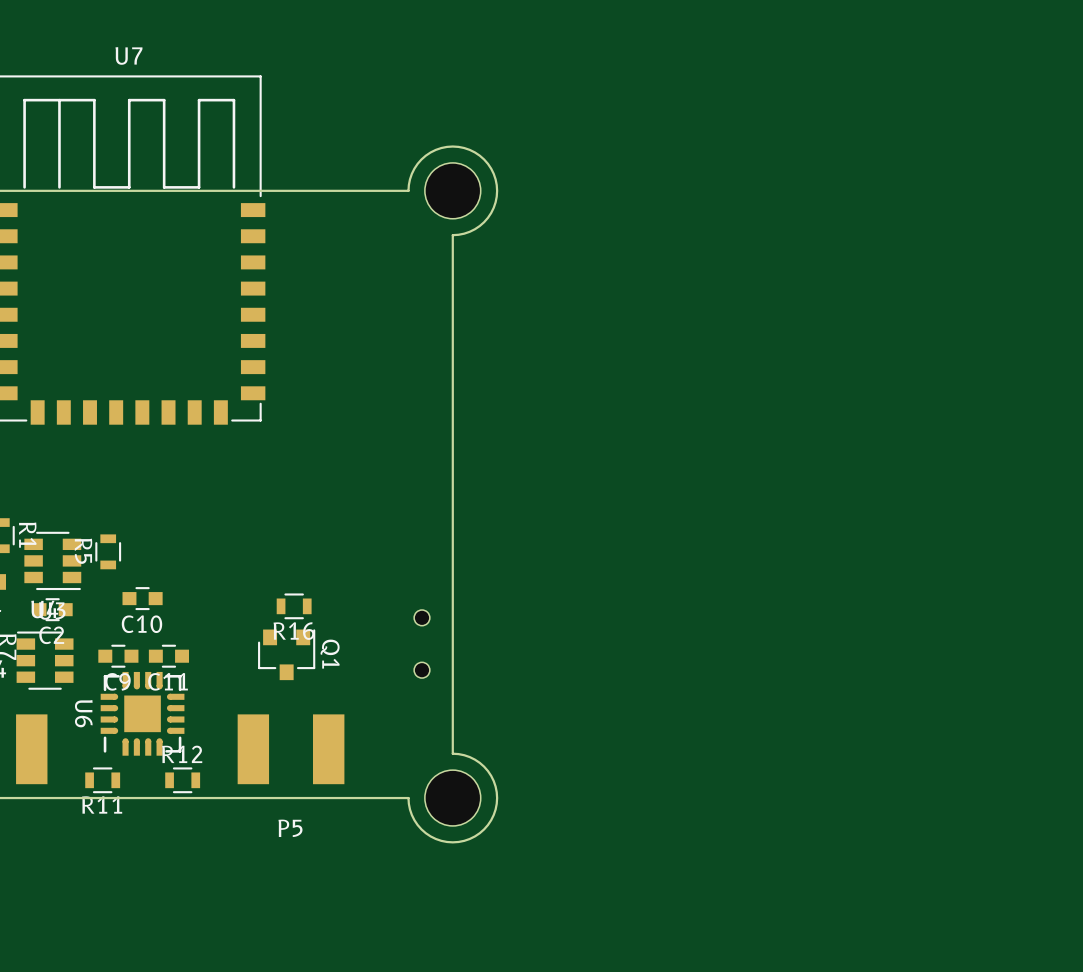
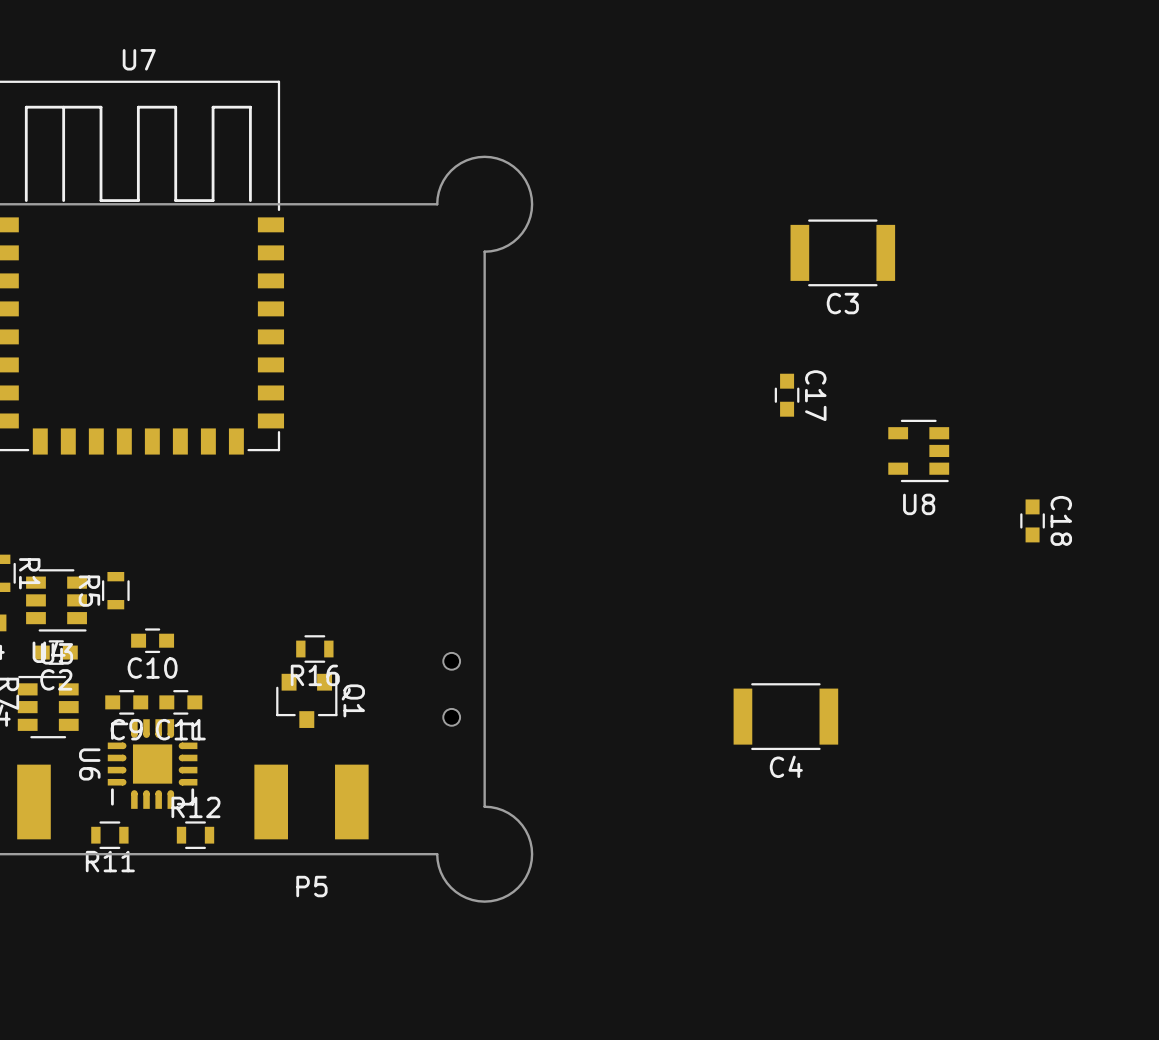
part: (452, 190) -> none
C3: none -> (842, 252)
C17: none -> (787, 395)
U8: none -> (918, 450)
C18: none -> (1032, 520)
C4: none -> (785, 716)
part: (452, 798) -> none

